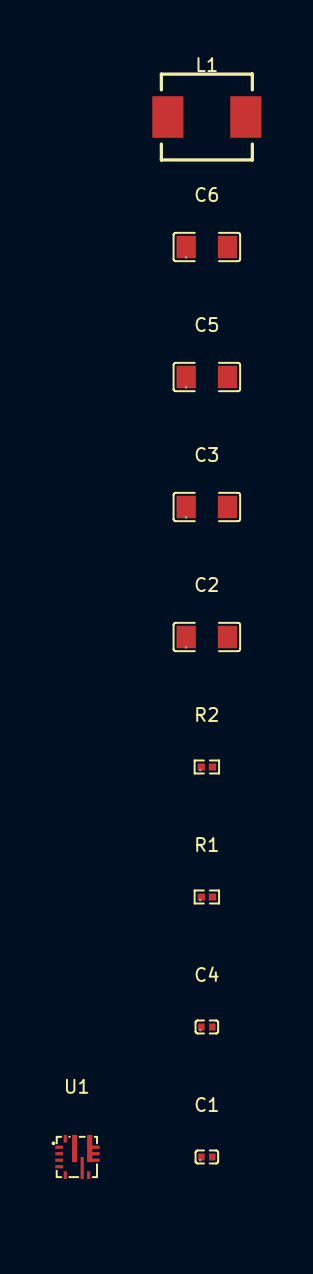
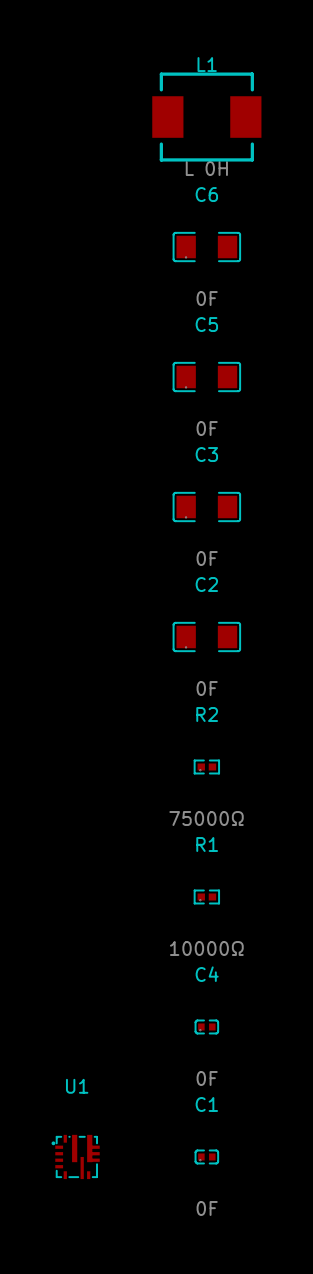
L1 value: none -> L 0H (206, 168)
C6 value: none -> 0F (207, 298)
C5 value: none -> 0F (207, 428)
C3 value: none -> 0F (207, 558)
C2 value: none -> 0F (207, 688)
R2 value: none -> 75000Ω (206, 818)
R1 value: none -> 10000Ω (206, 948)
C4 value: none -> 0F (207, 1078)
C1 value: none -> 0F (207, 1208)

